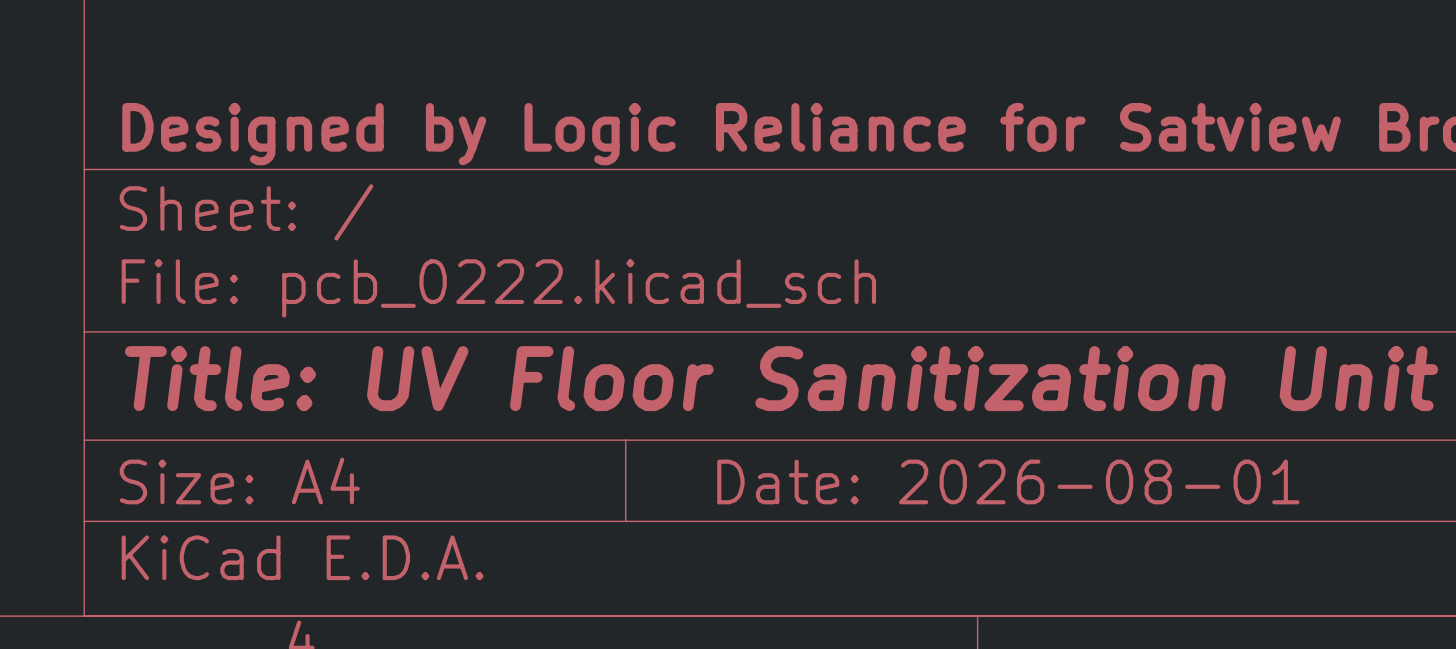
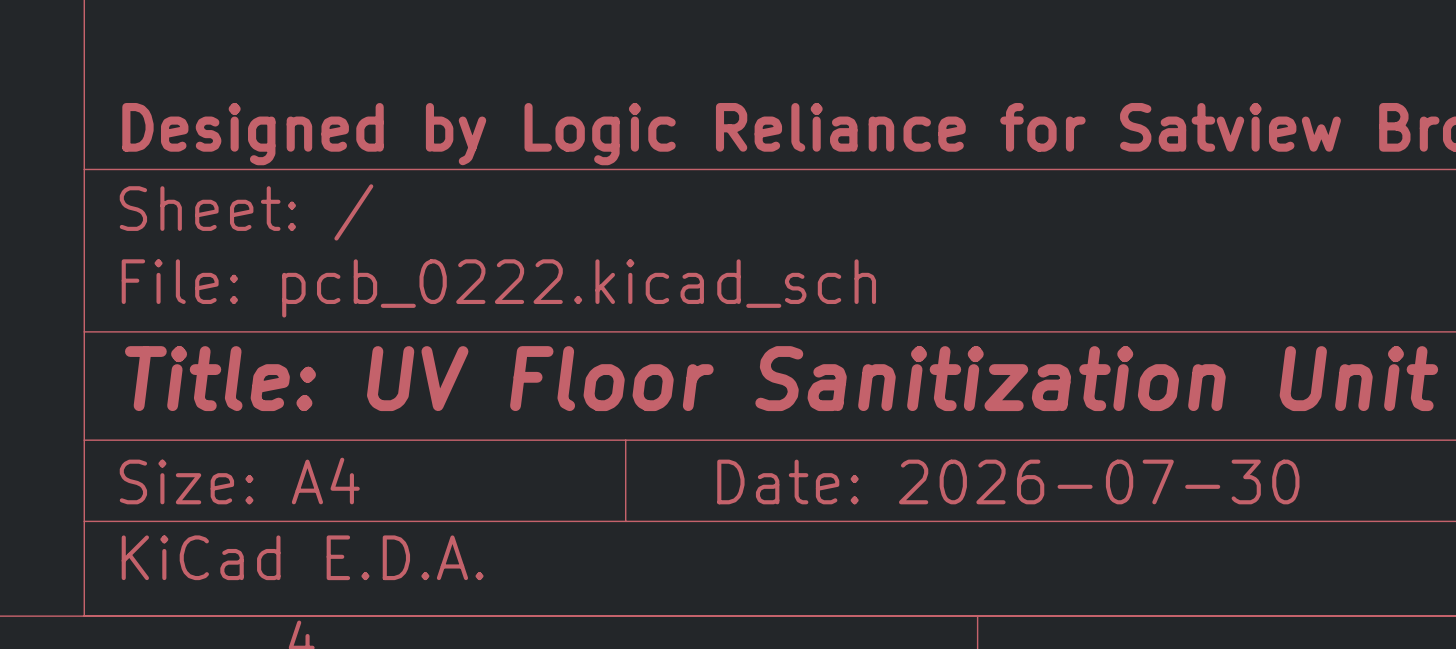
title block: Date: 2026-08-01 (1008, 481) -> Date: 2026-07-30 (1008, 481)

